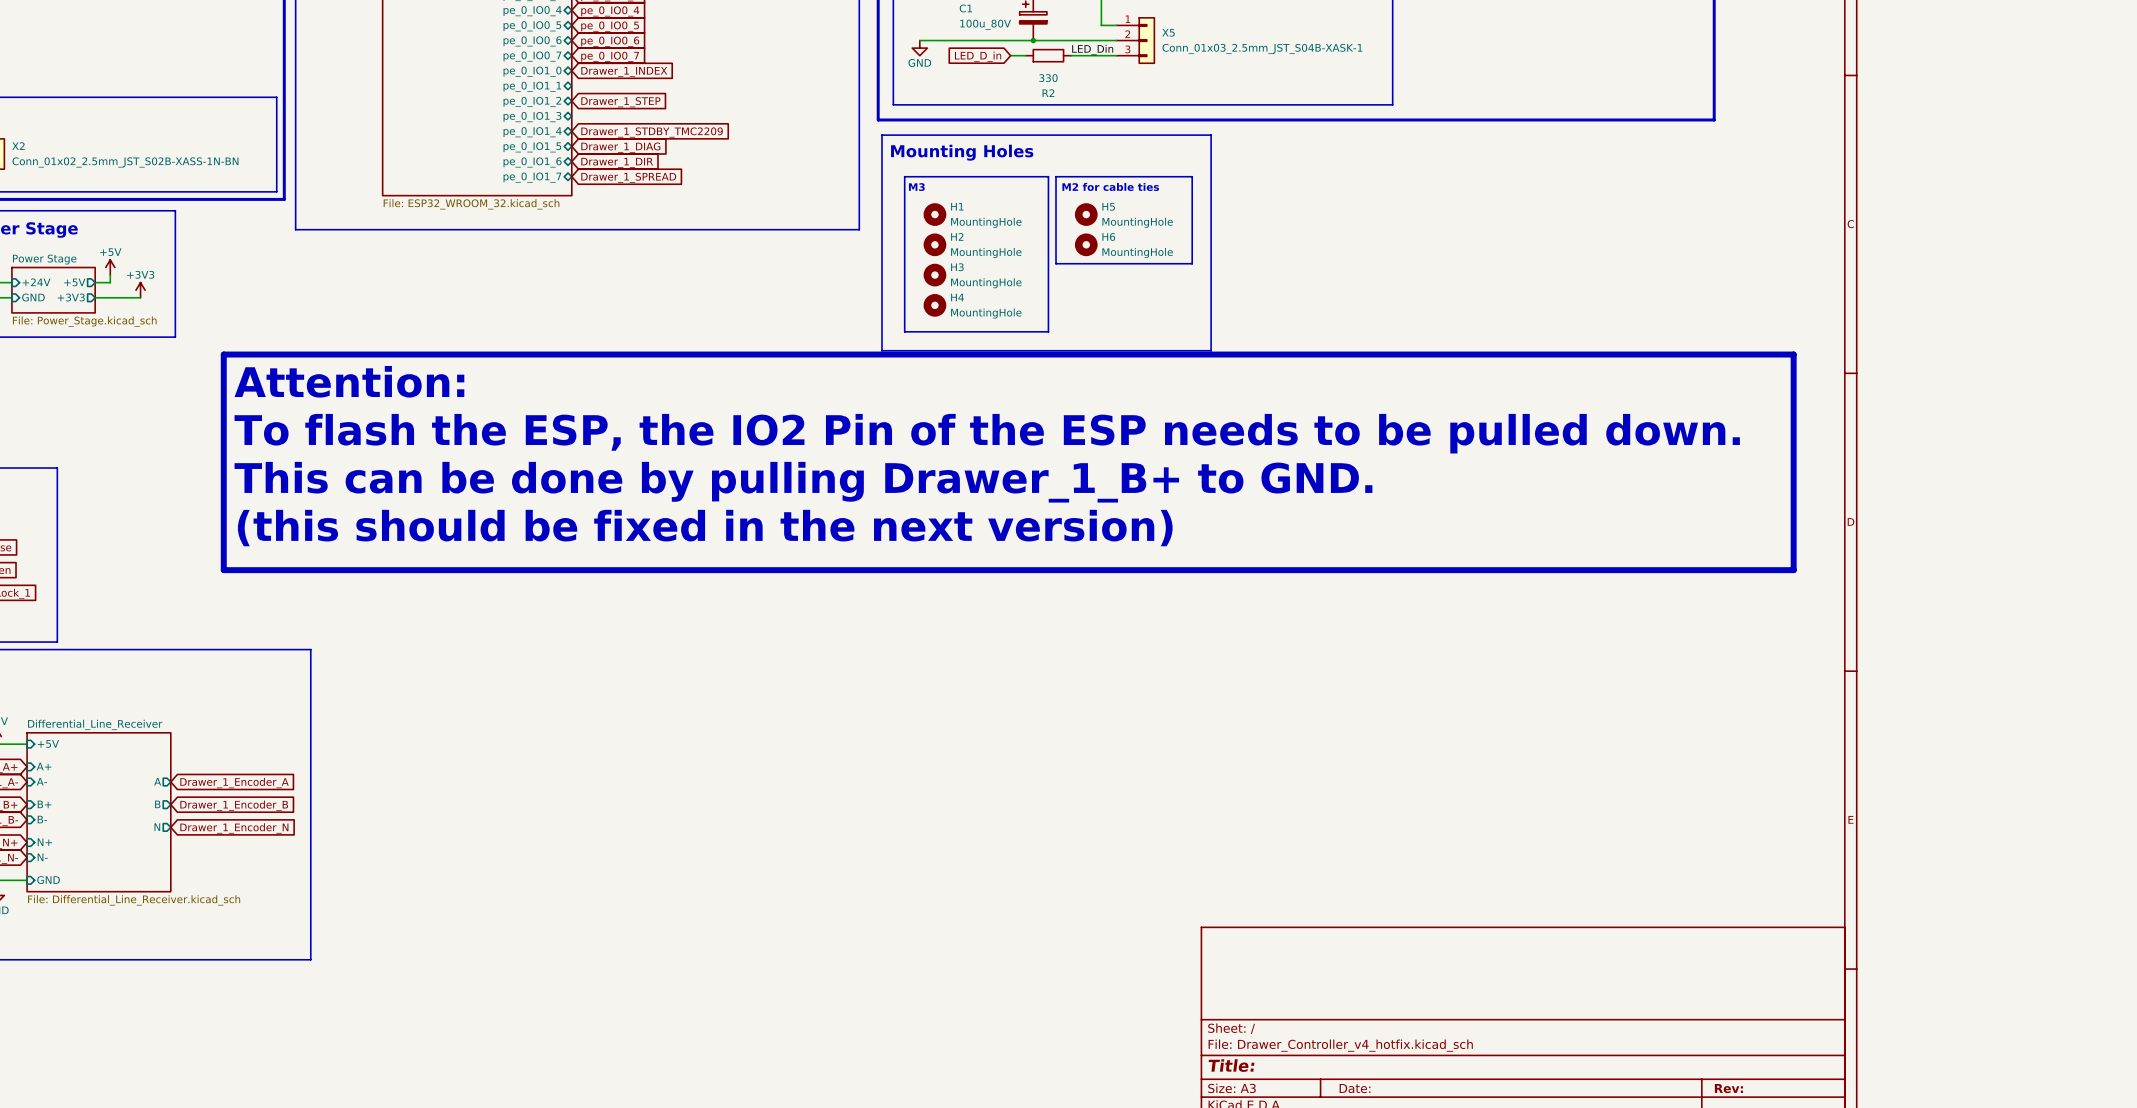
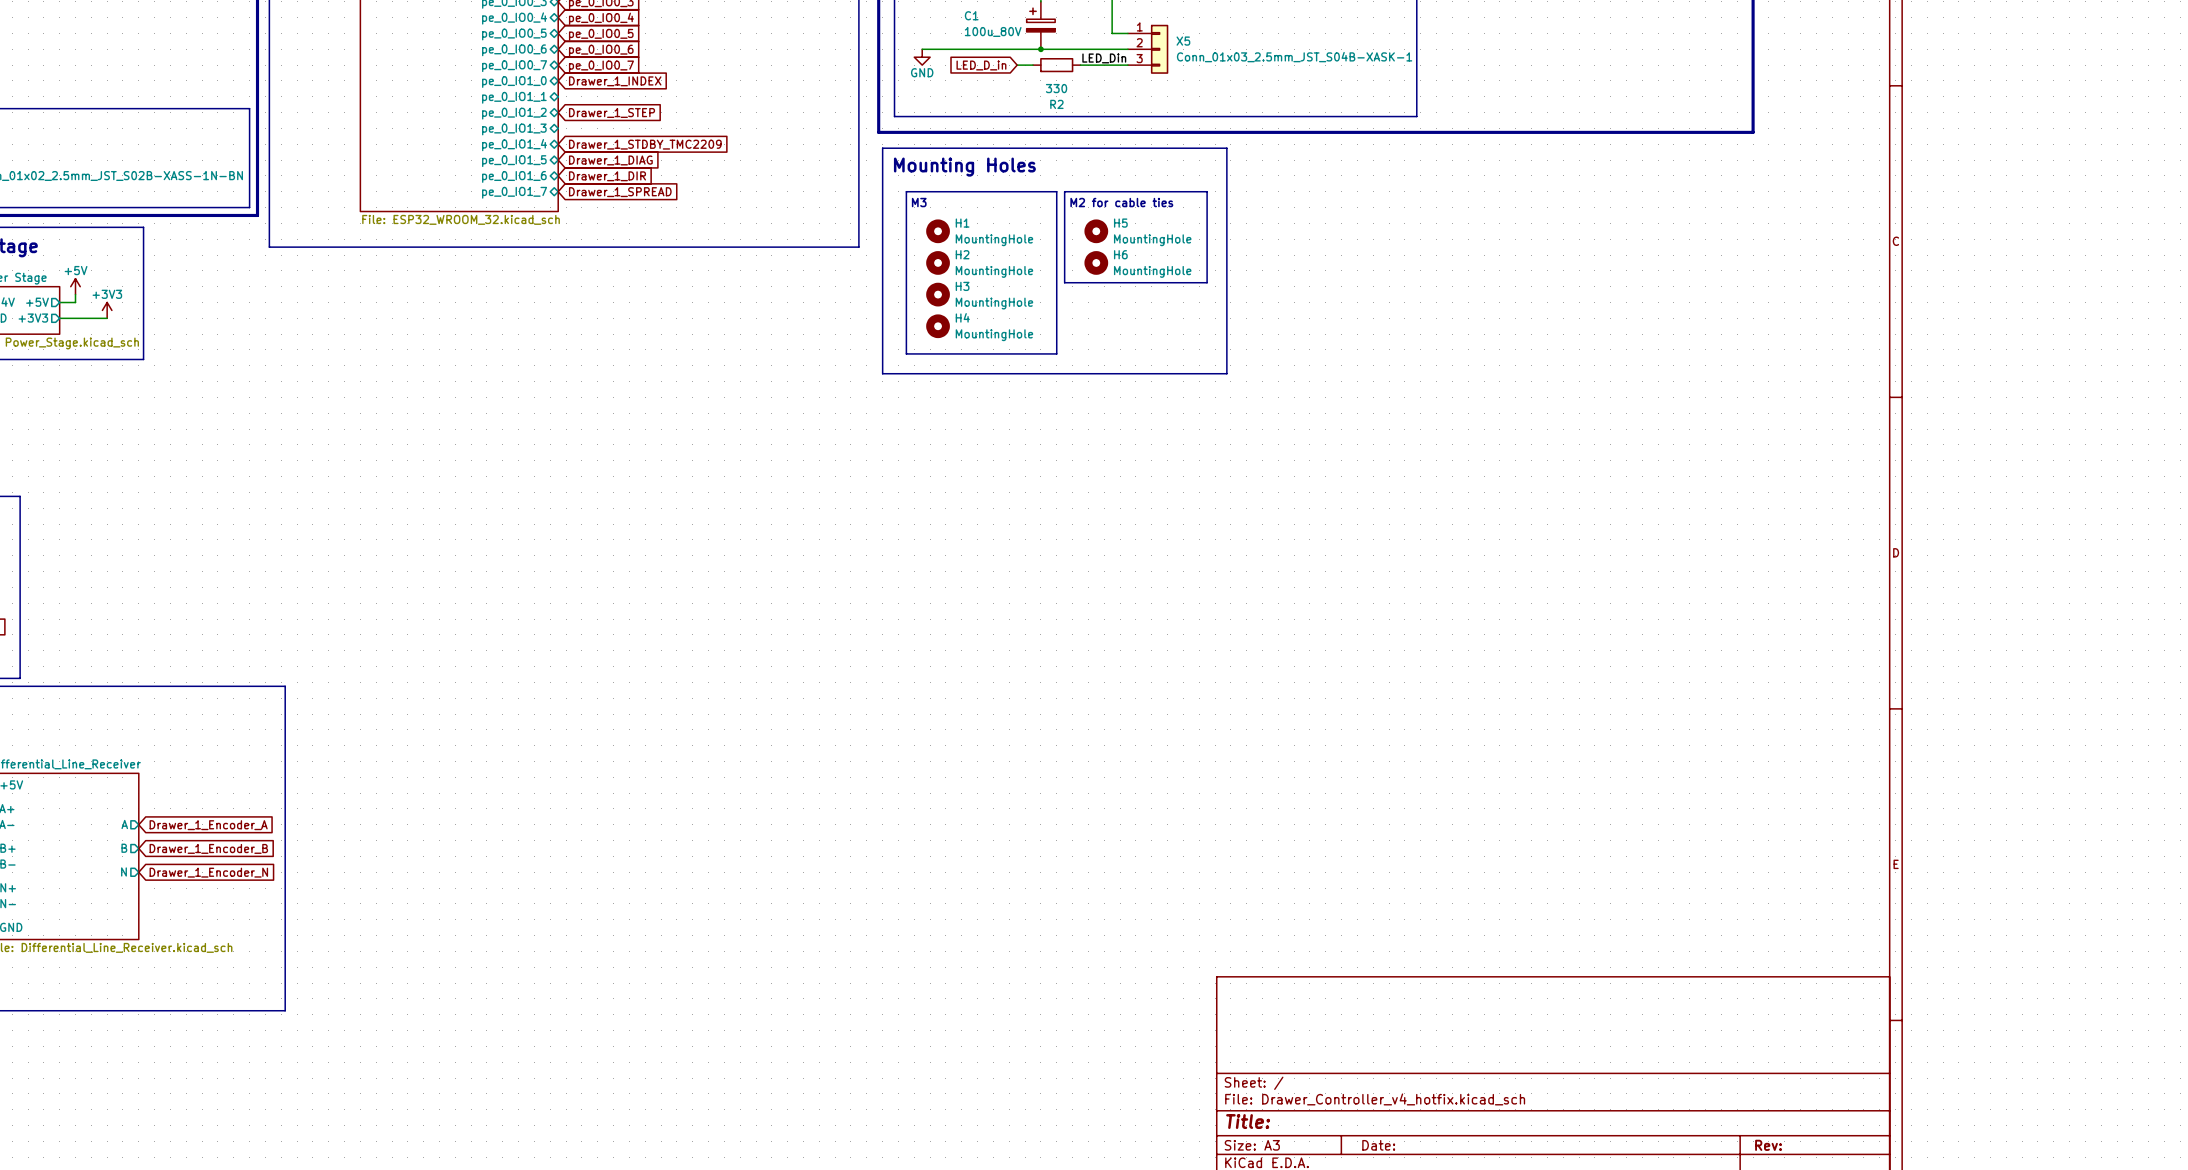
line: (223, 354) (1793, 354) (1793, 570) (223, 570) (223, 354) -> none
text: Attention: (349, 381) -> none
text: To flash the ESP, the IO2 Pin of the ESP needs to be pulled down. (987, 433) -> none
text: This can be done by pulling Drawer_1_B+ to GND. (803, 482) -> none
text: (this should be fixed in the next version) (705, 528) -> none

